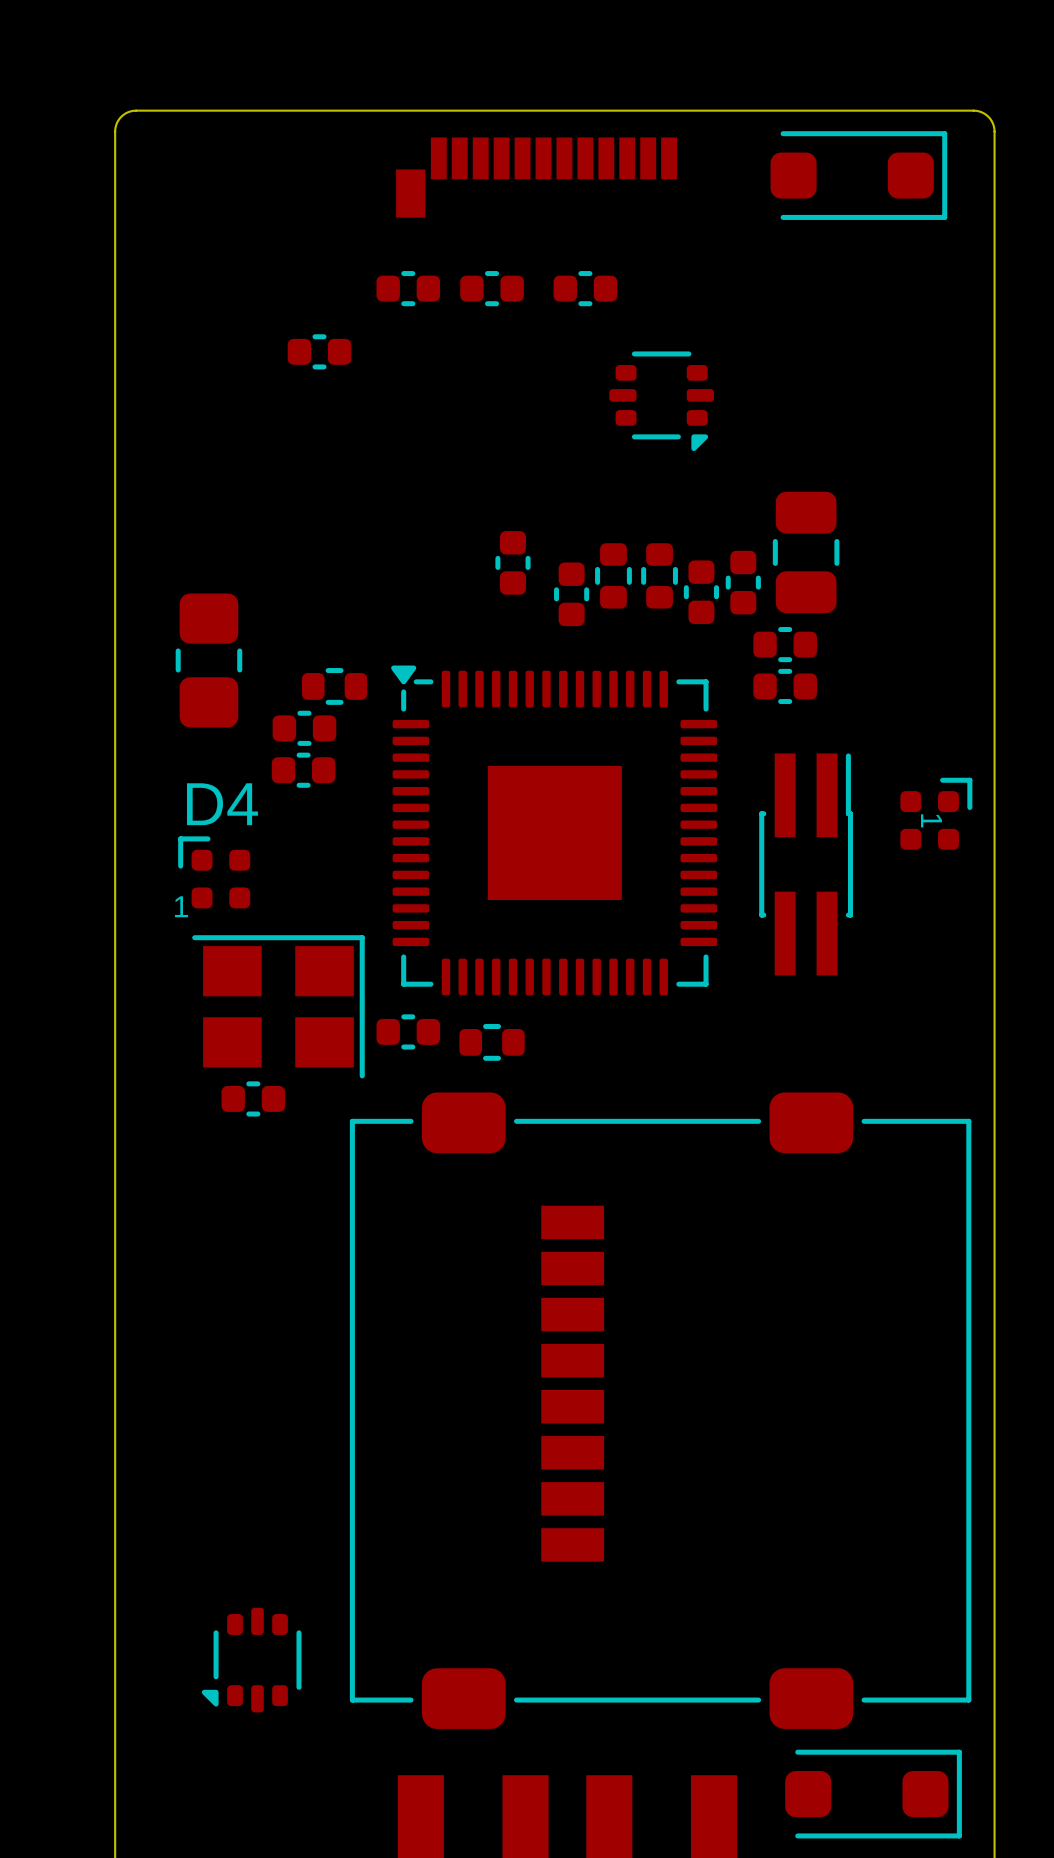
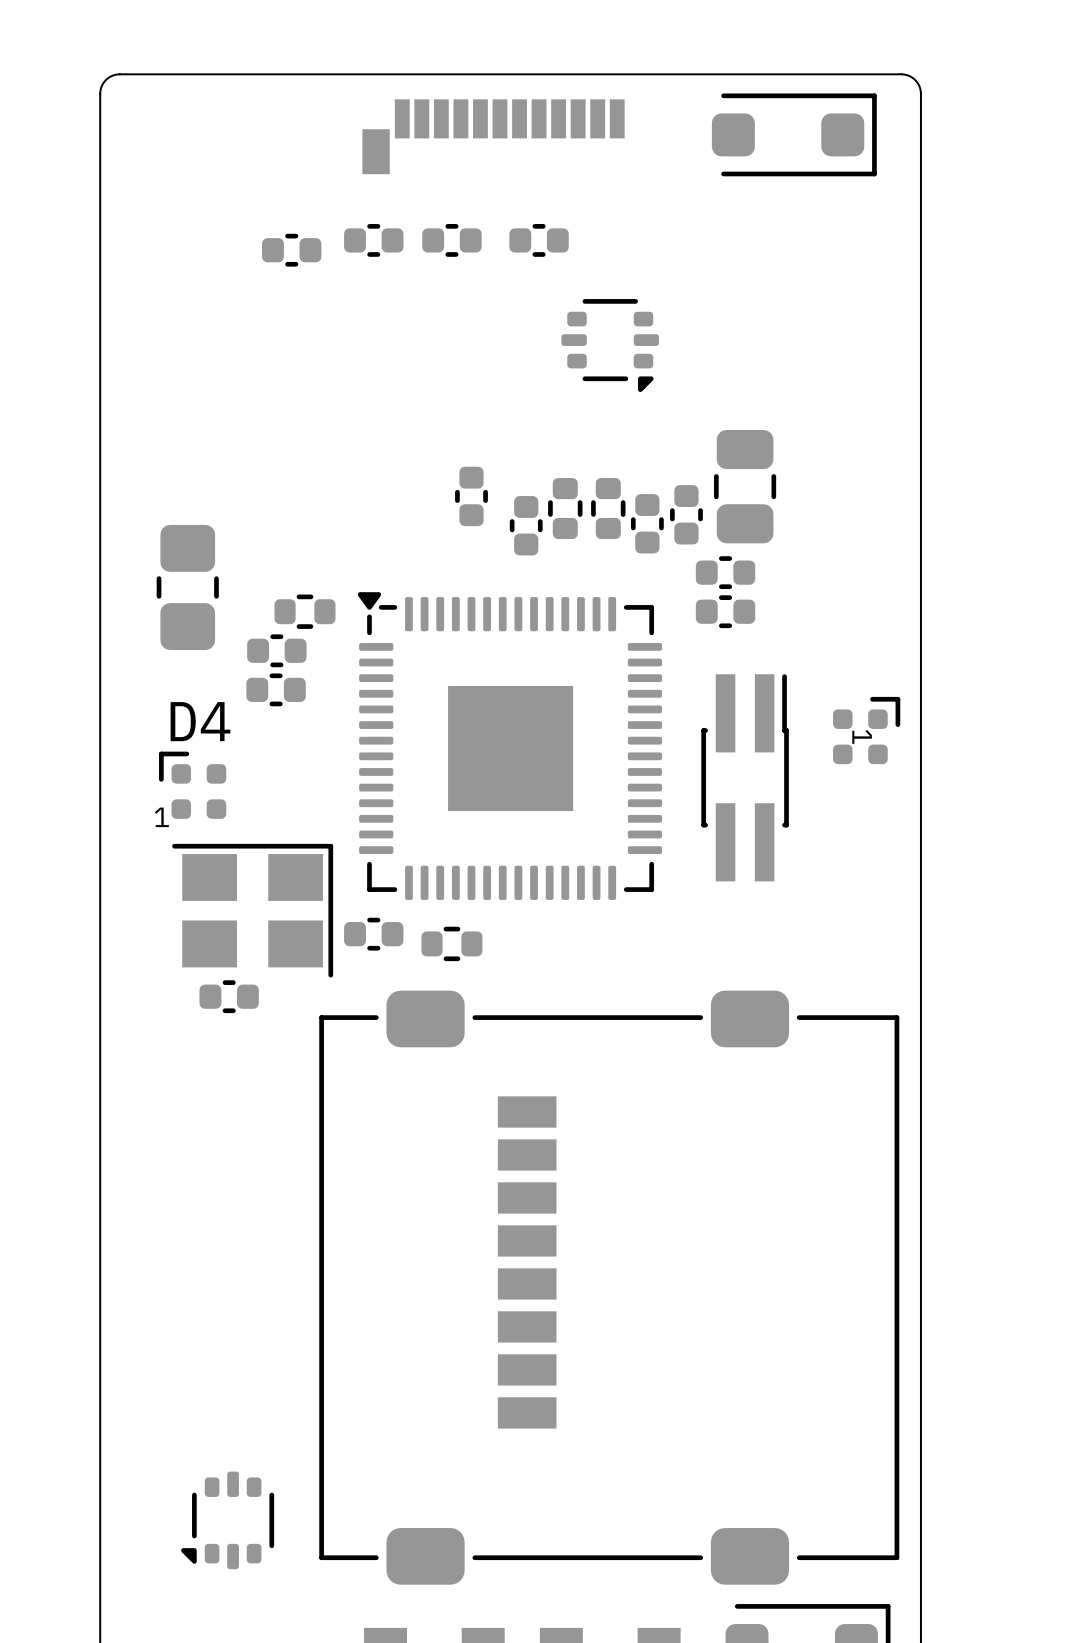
part position: (319, 351) -> (291, 250)

